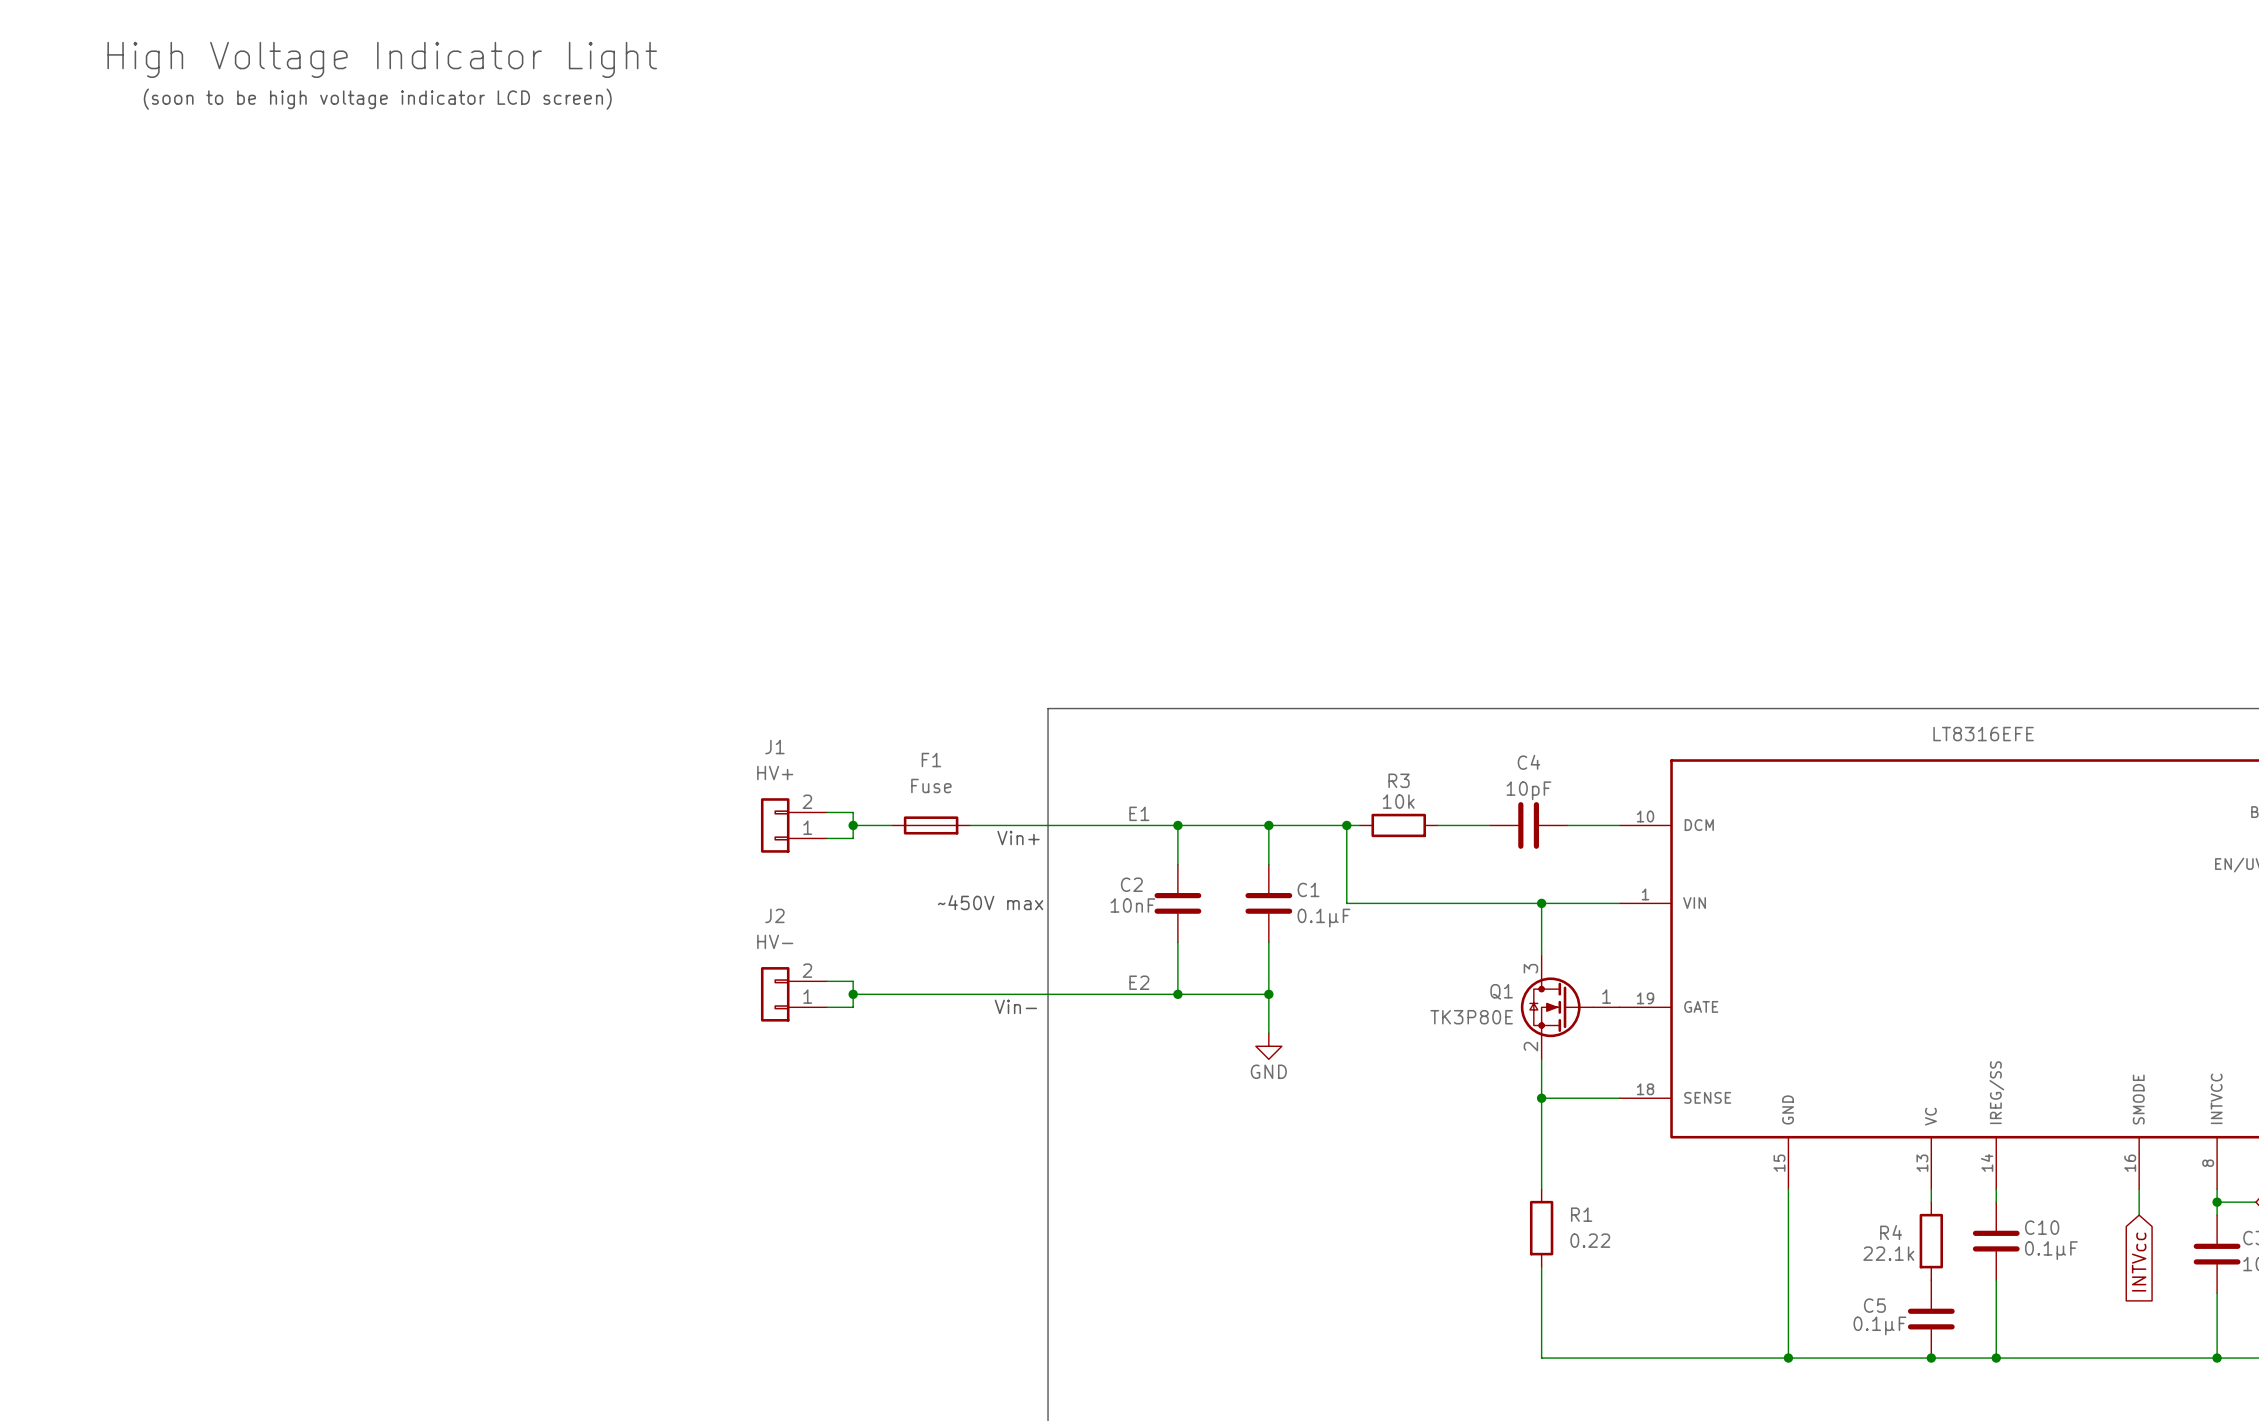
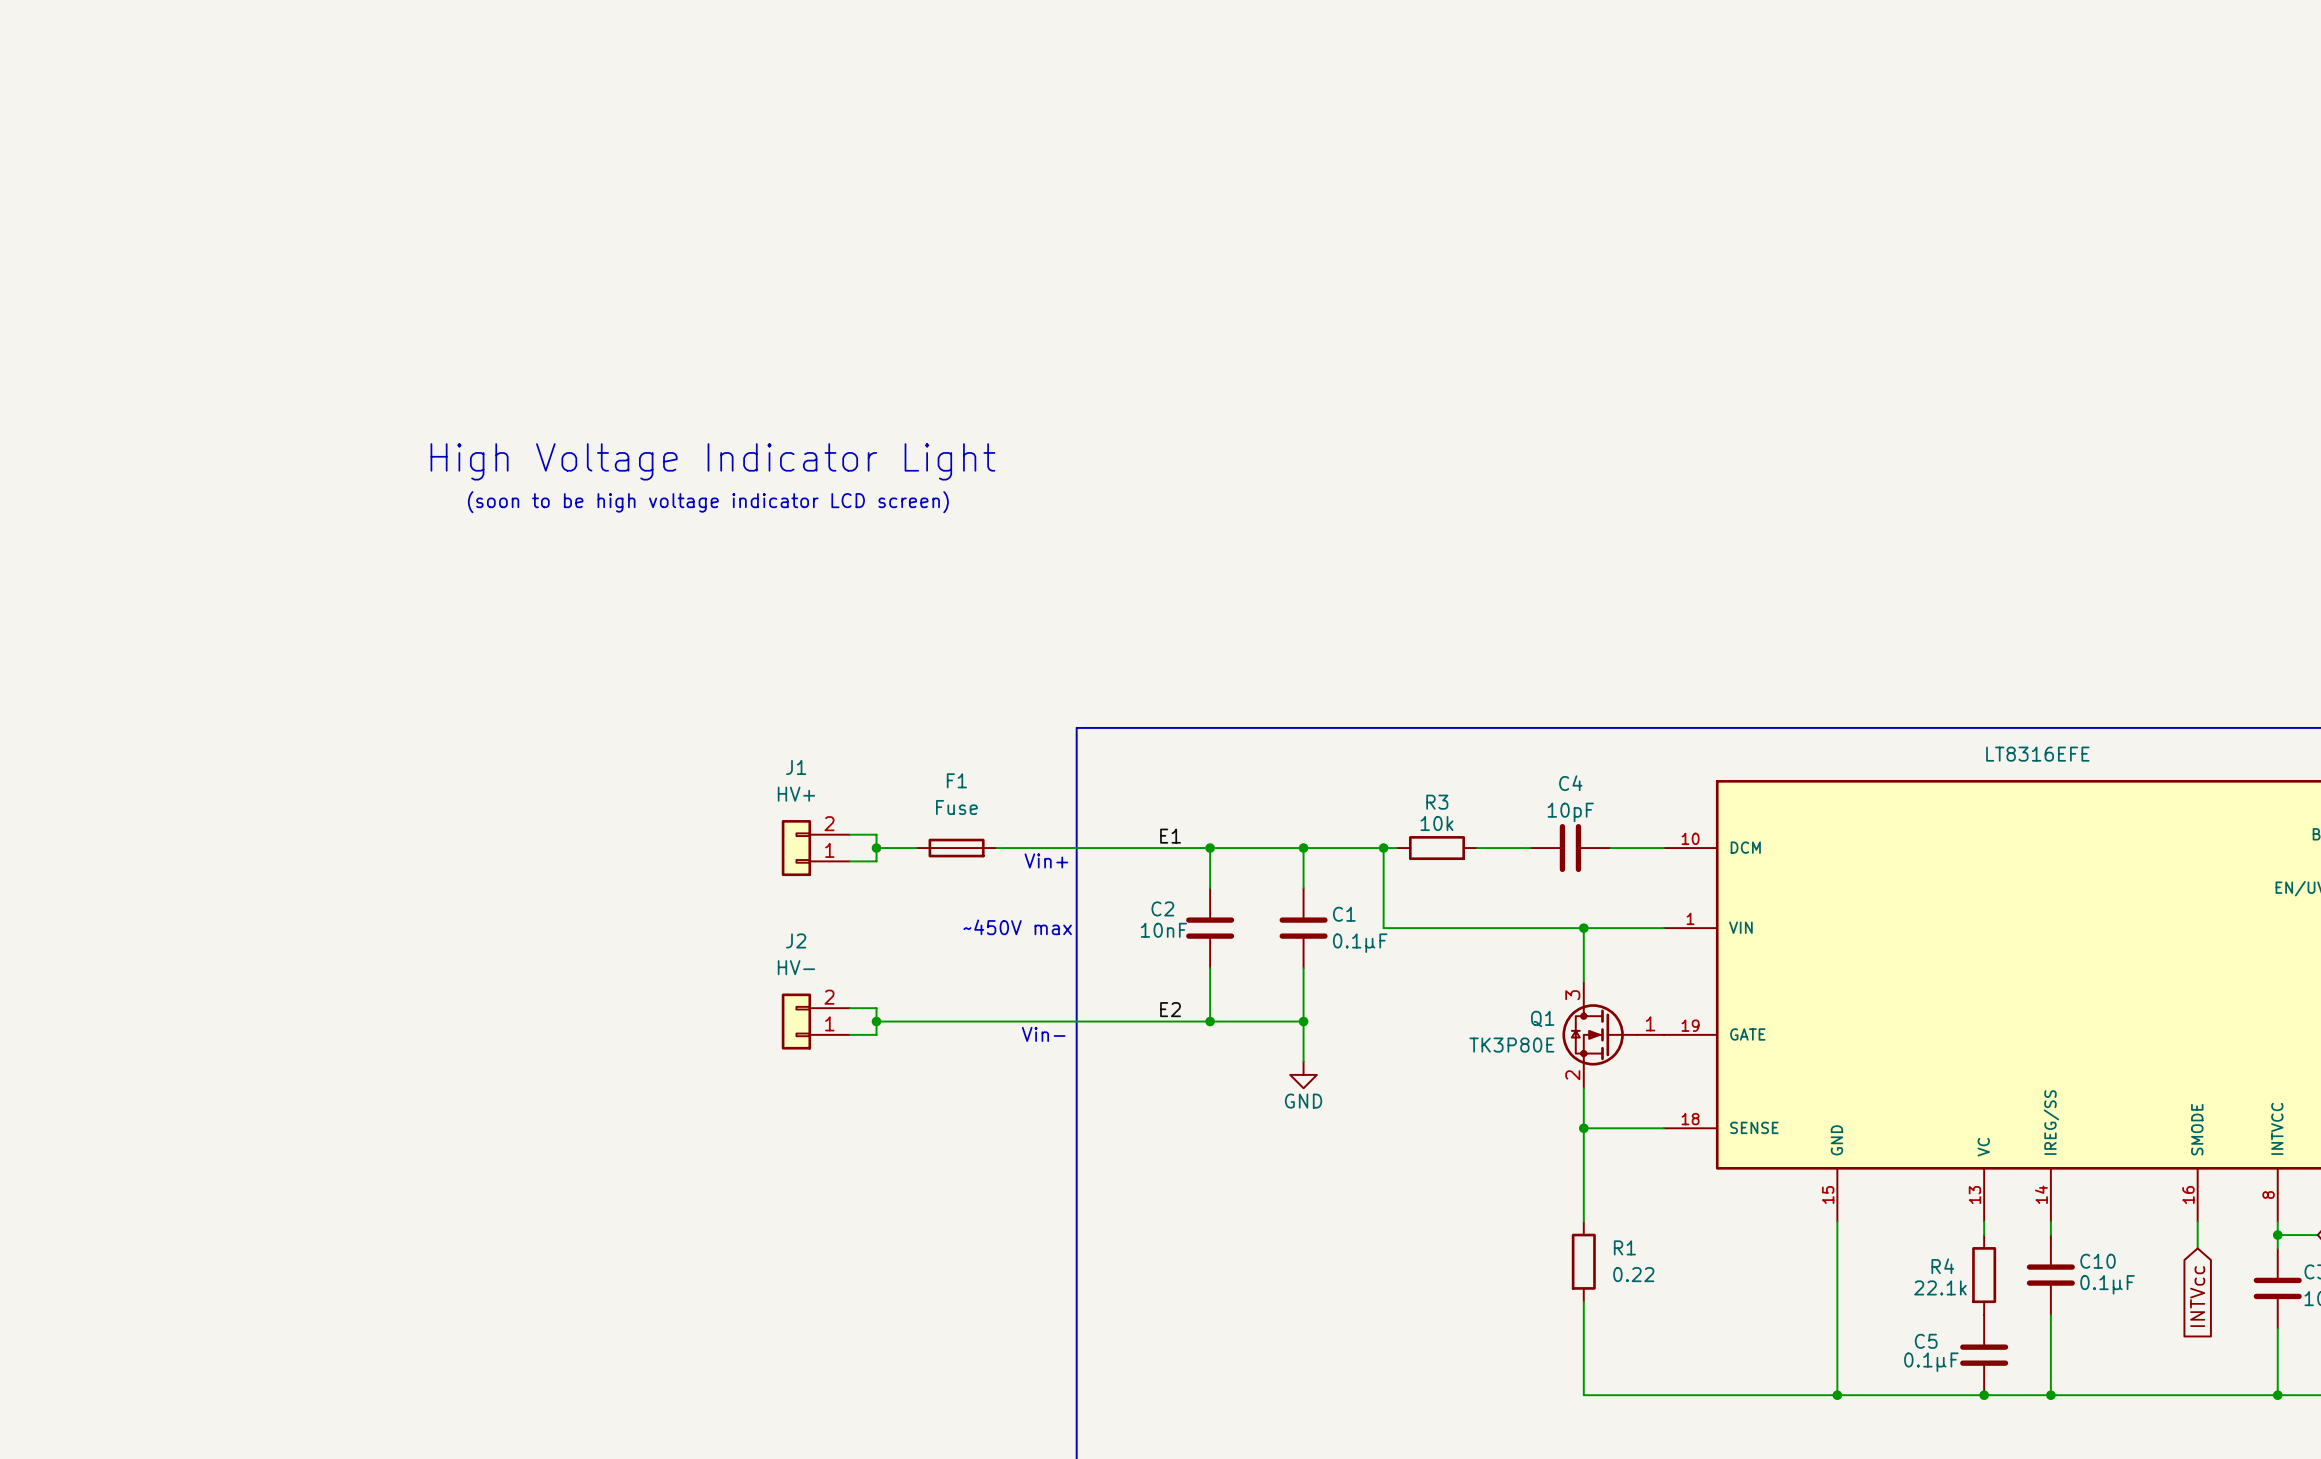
text: High Voltage Indicator Light (382, 59) -> none
text: (soon to be high voltage indicator LCD screen) (377, 99) -> none
text: none -> High Voltage Indicator Light (712, 461)
text: none -> (soon to be high voltage indicator LCD screen) (708, 502)

